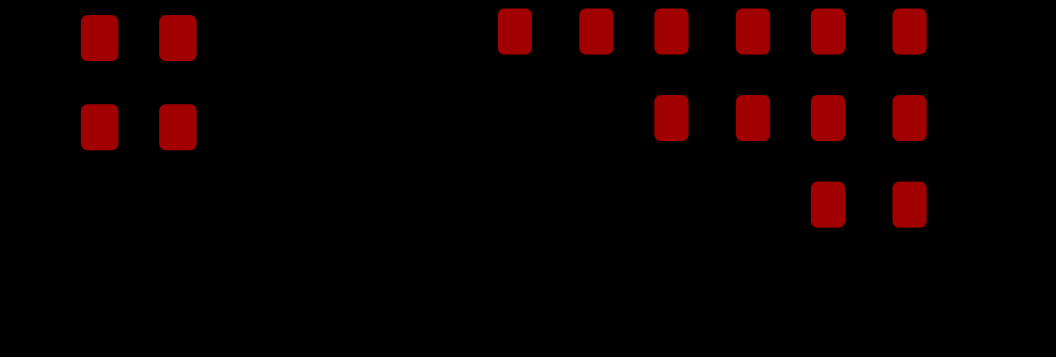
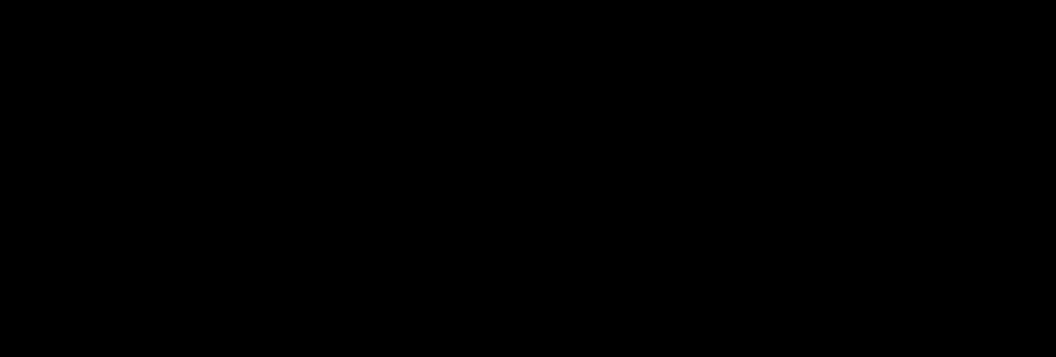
part: (555, 31) -> none
part: (712, 31) -> none
part: (868, 31) -> none
part: (138, 38) -> none
part: (712, 118) -> none
part: (868, 118) -> none
part: (138, 127) -> none
part: (868, 204) -> none

